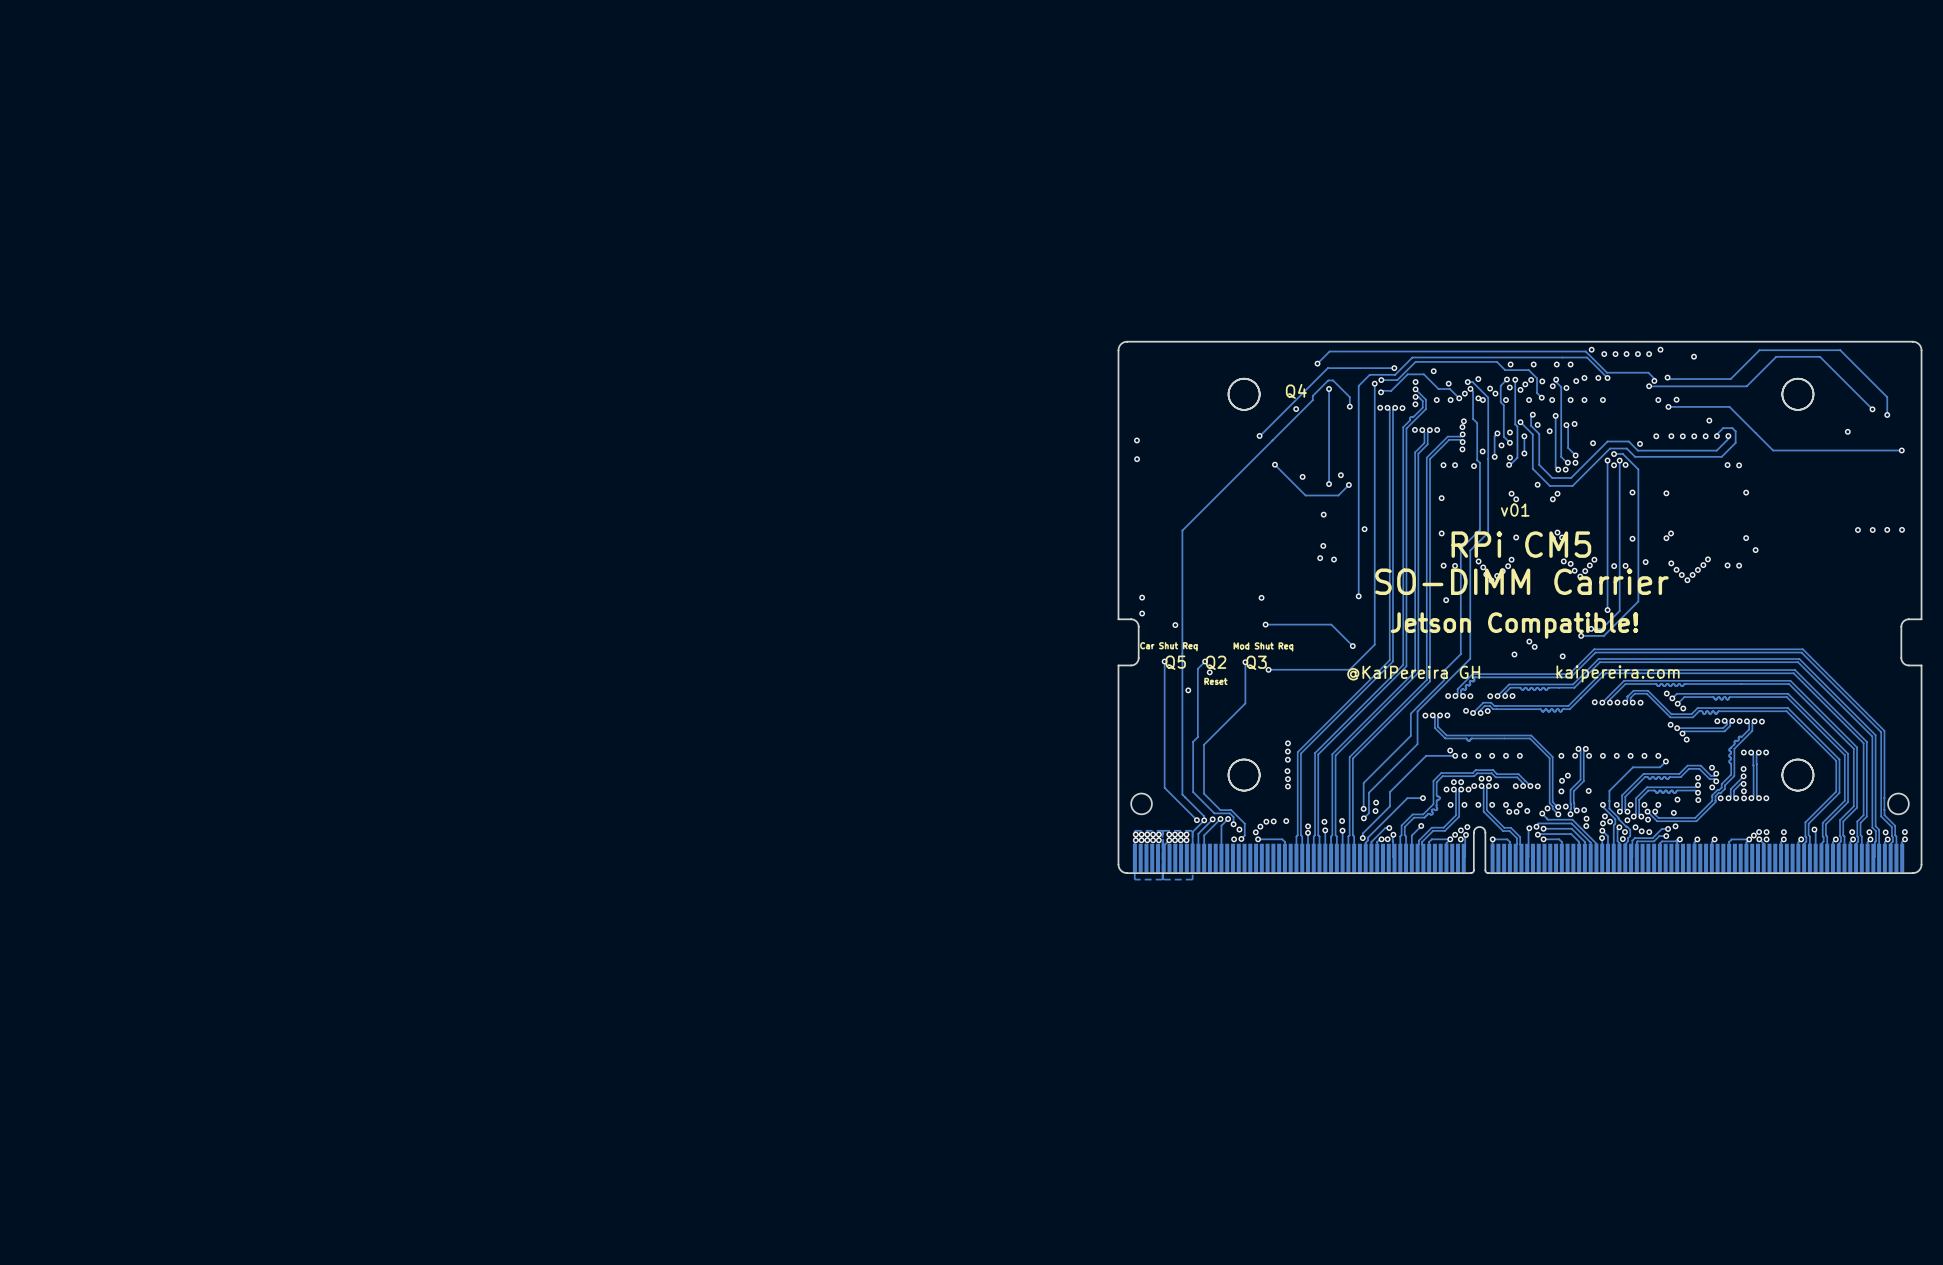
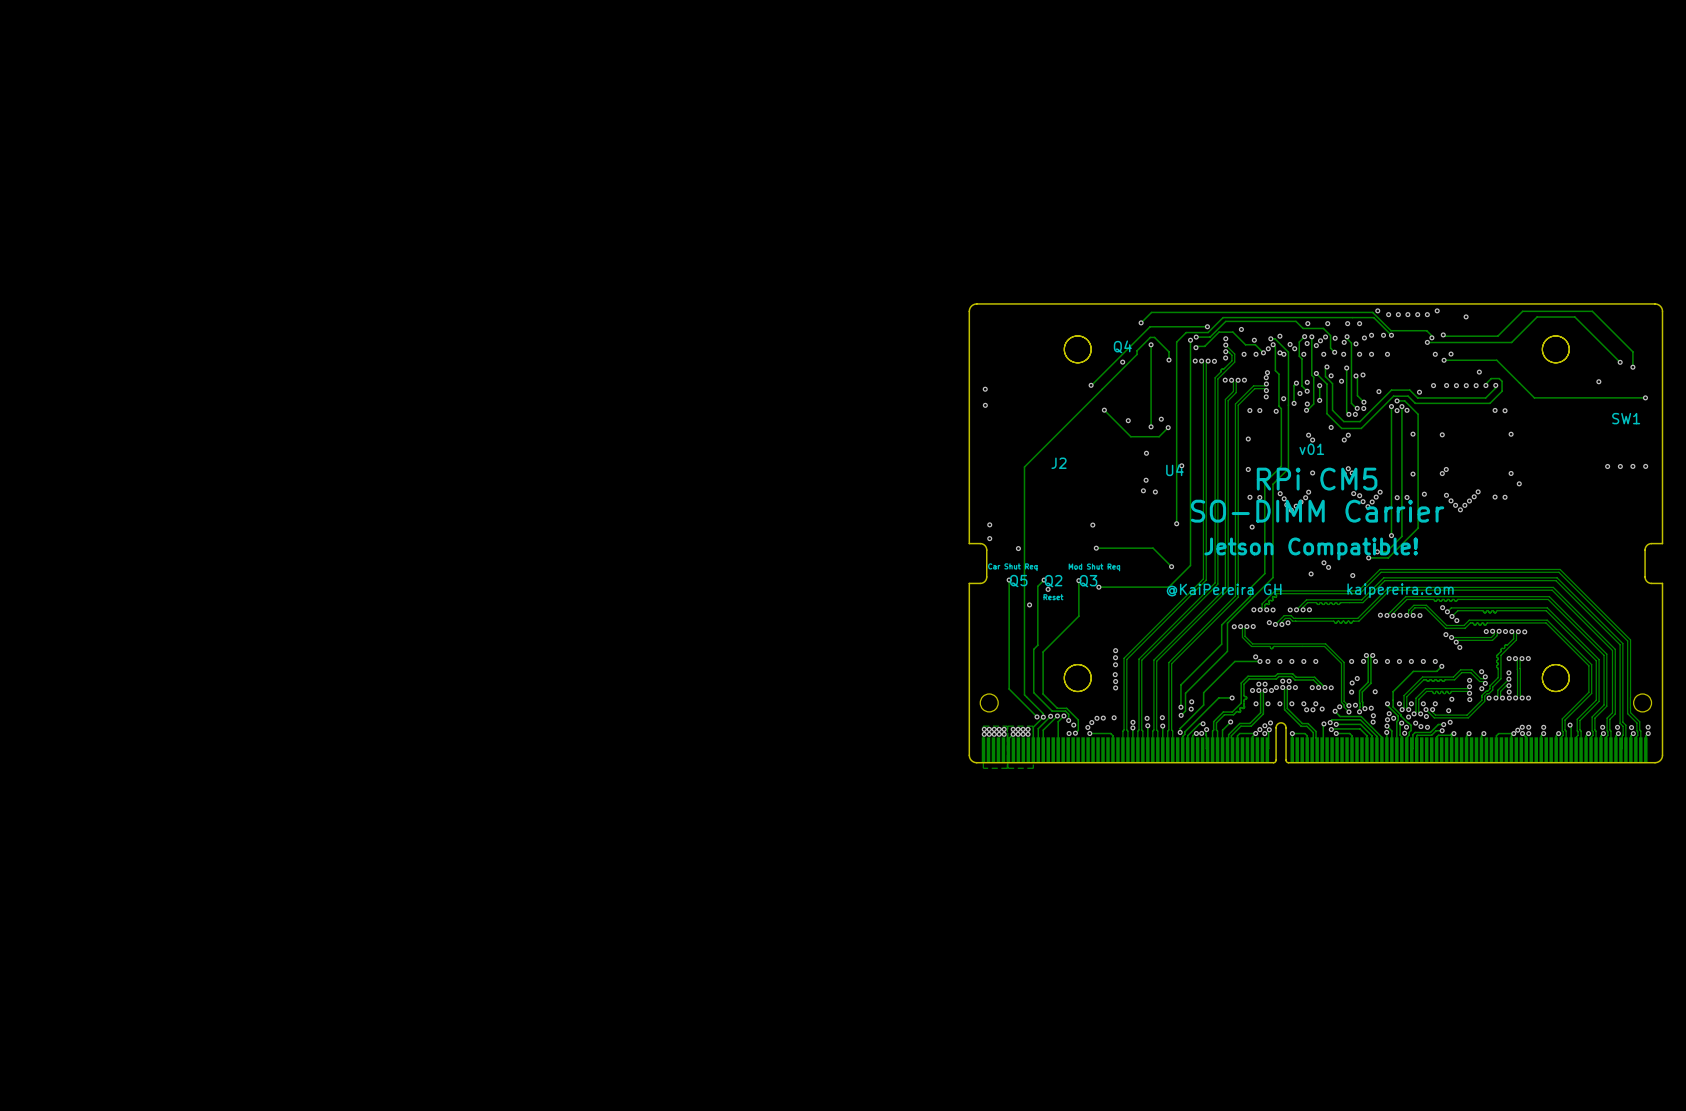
SW1: none -> (1626, 418)
J2: none -> (1059, 463)
U4: none -> (1174, 470)

